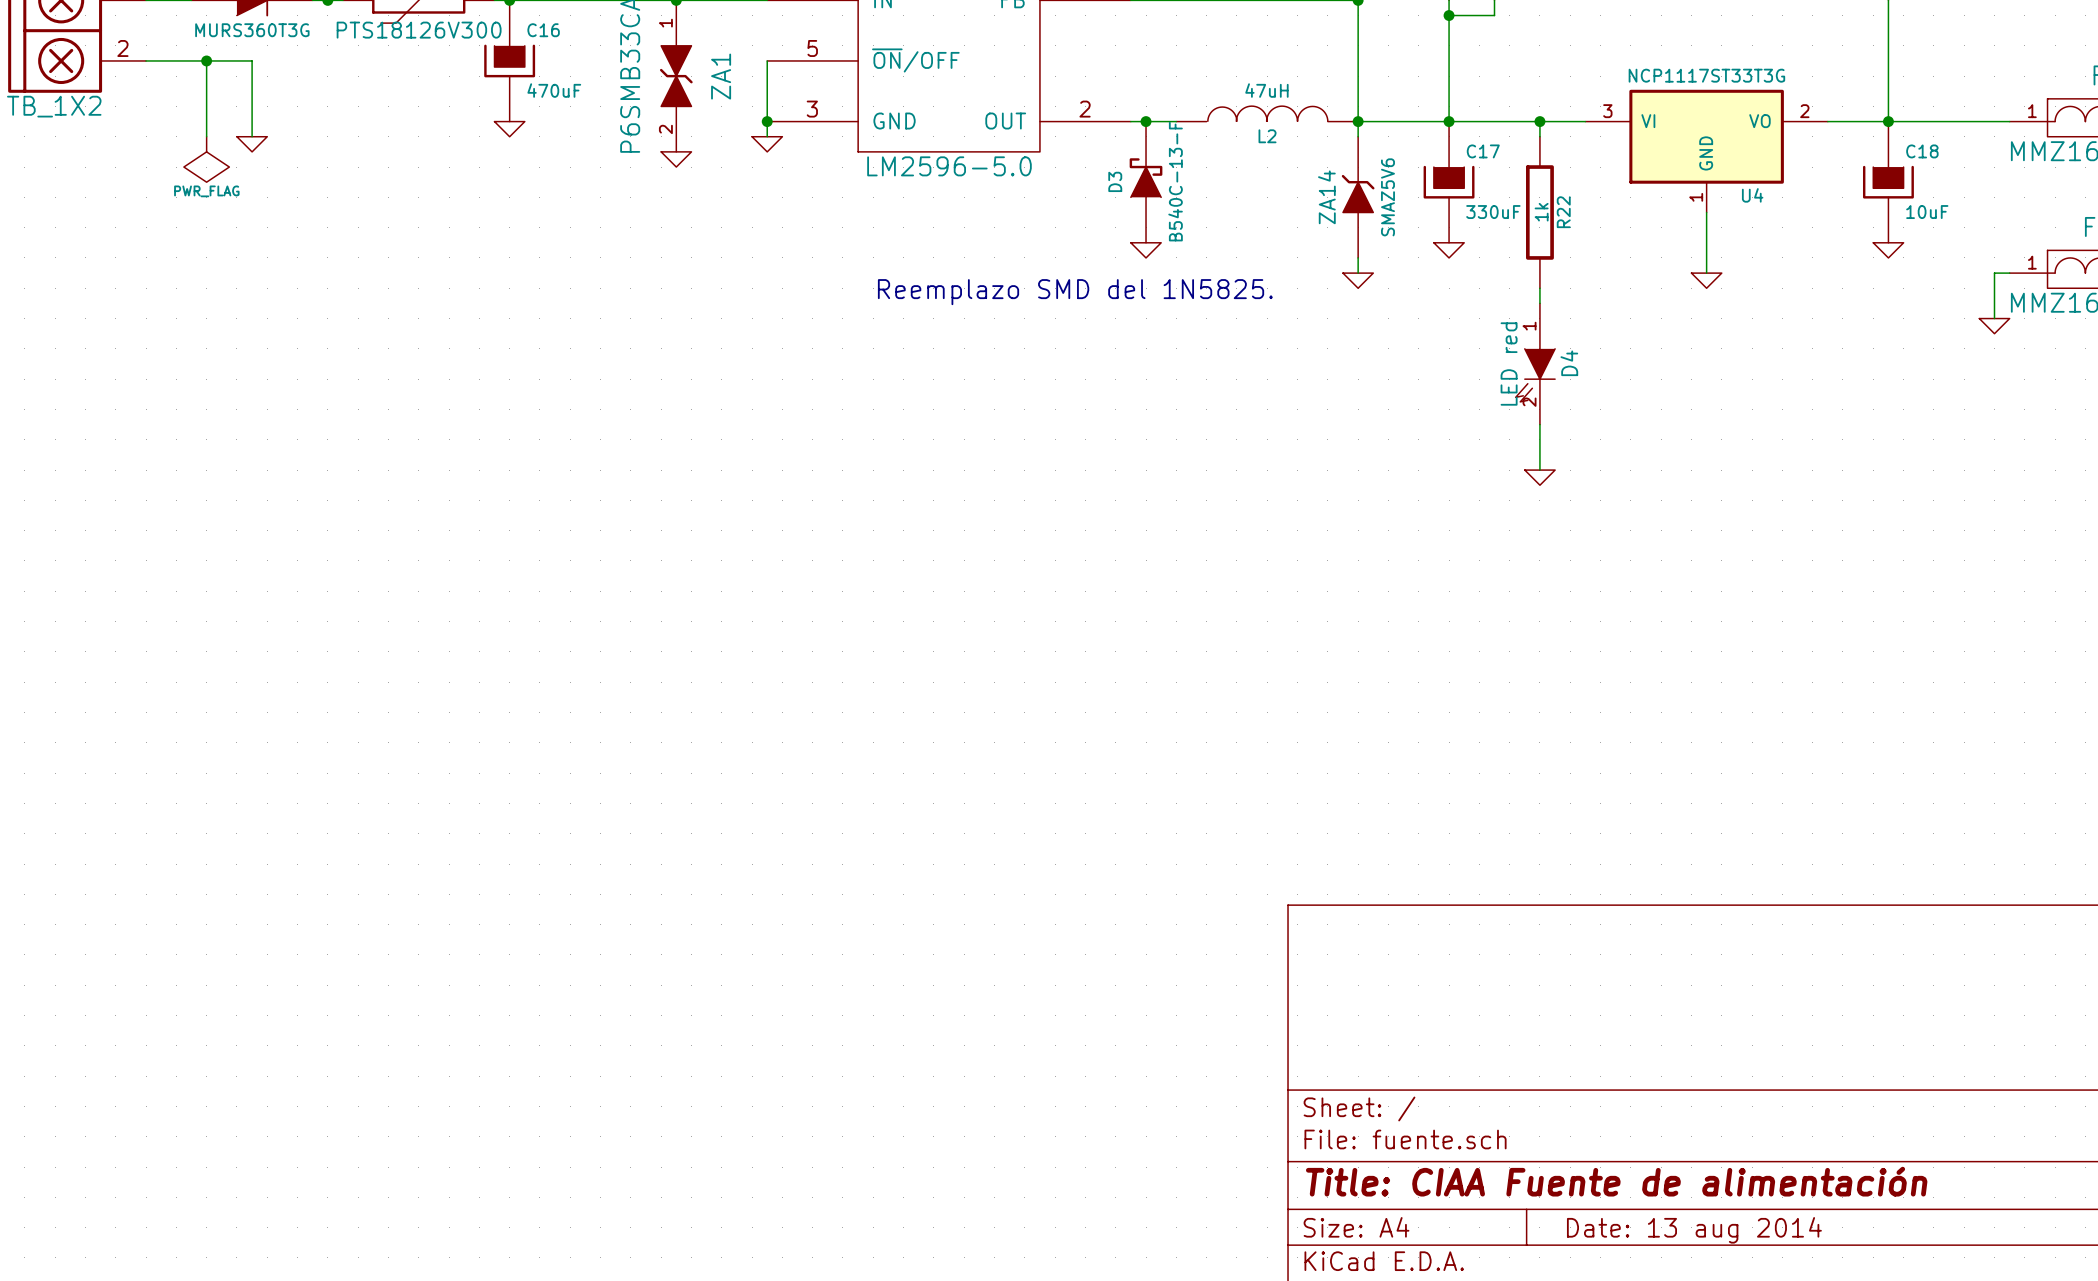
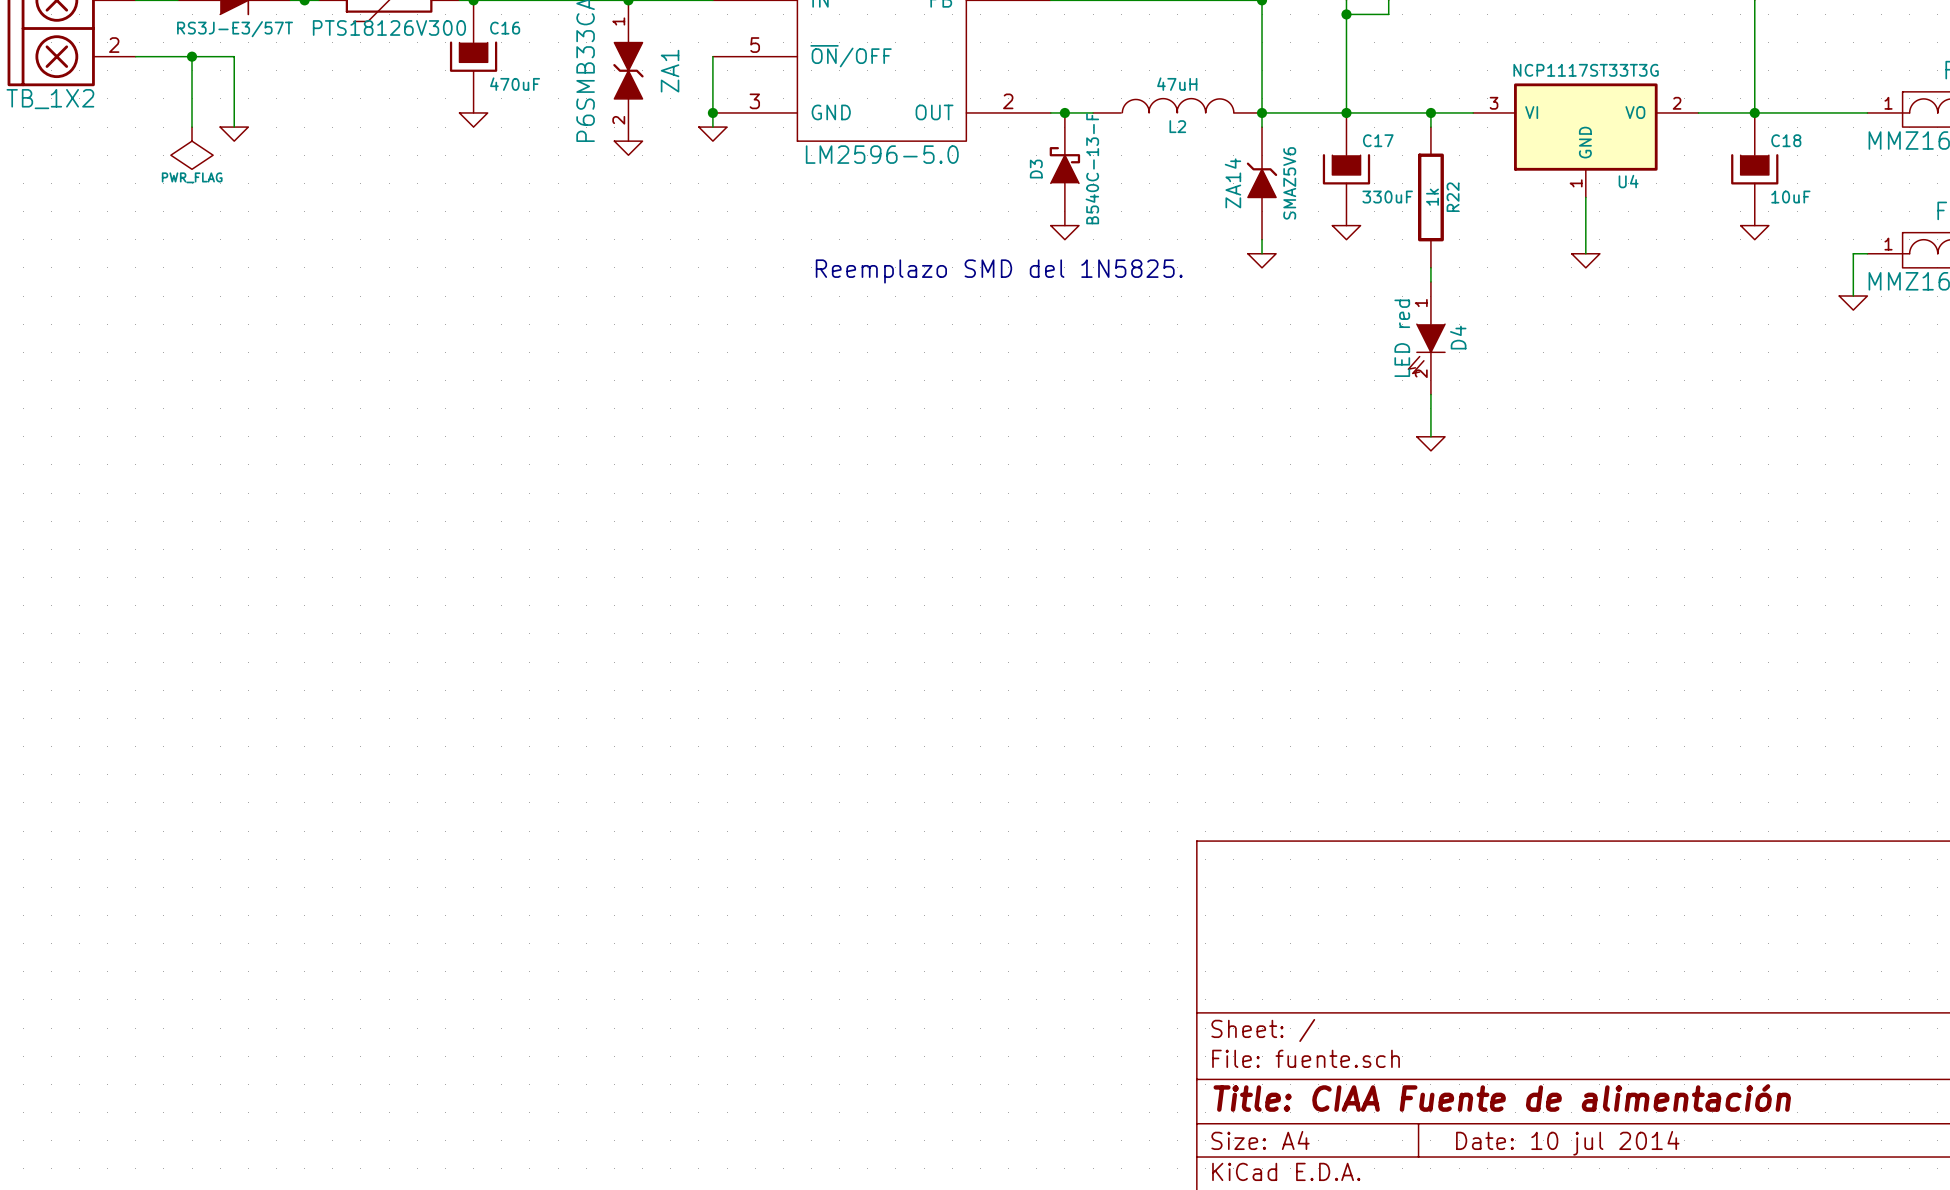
part value: MURS360T3G (252, 30) -> RS3J-E3/57T (235, 29)
title block: Date: 13 aug 2014 (1694, 1230) -> Date: 10 jul 2014 (1567, 1143)

